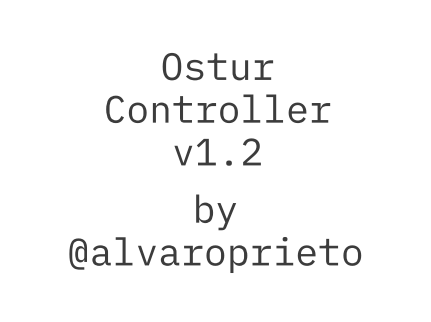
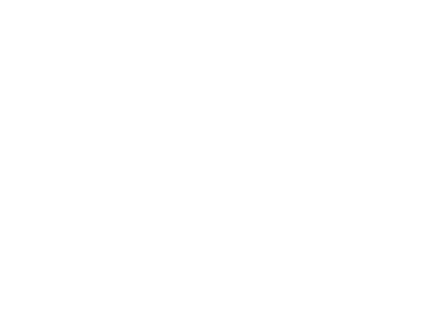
text: Ostur (217, 66) -> none
text: Controller (218, 108) -> none
text: v1.2 (217, 152) -> none
text: by (216, 212) -> none
text: @alvaroprieto (215, 254) -> none

